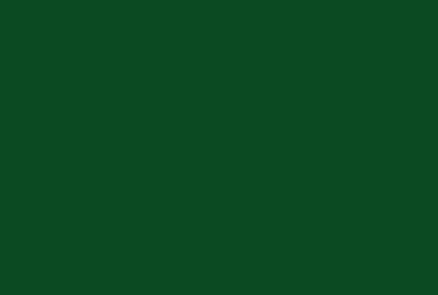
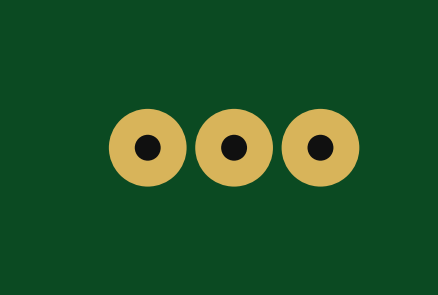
part: none -> (234, 147)

